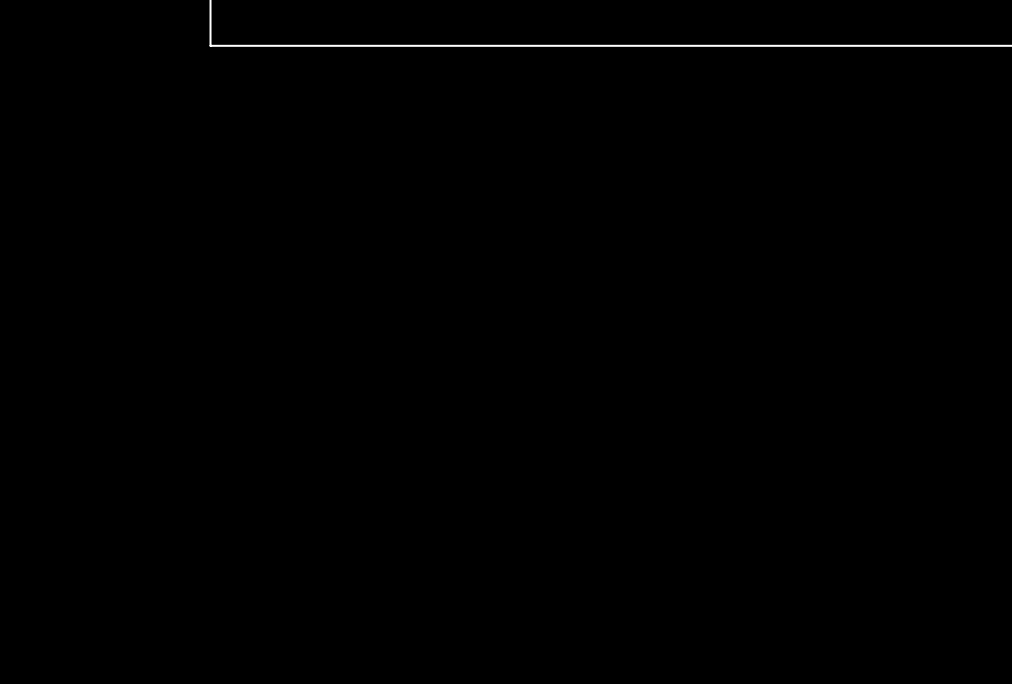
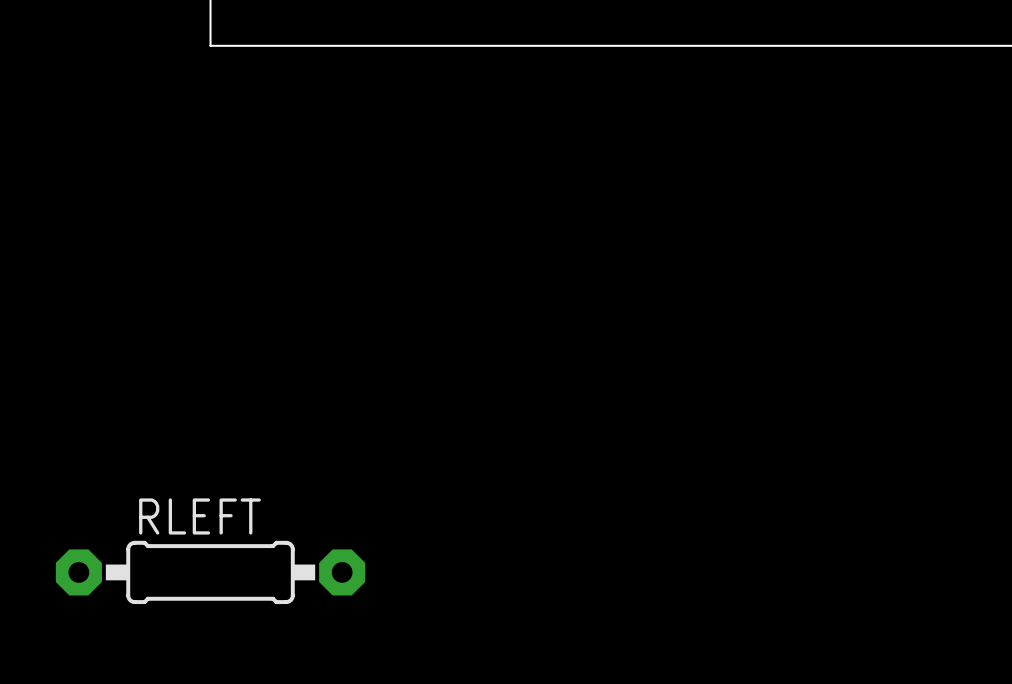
RLEFT: none -> (210, 572)

